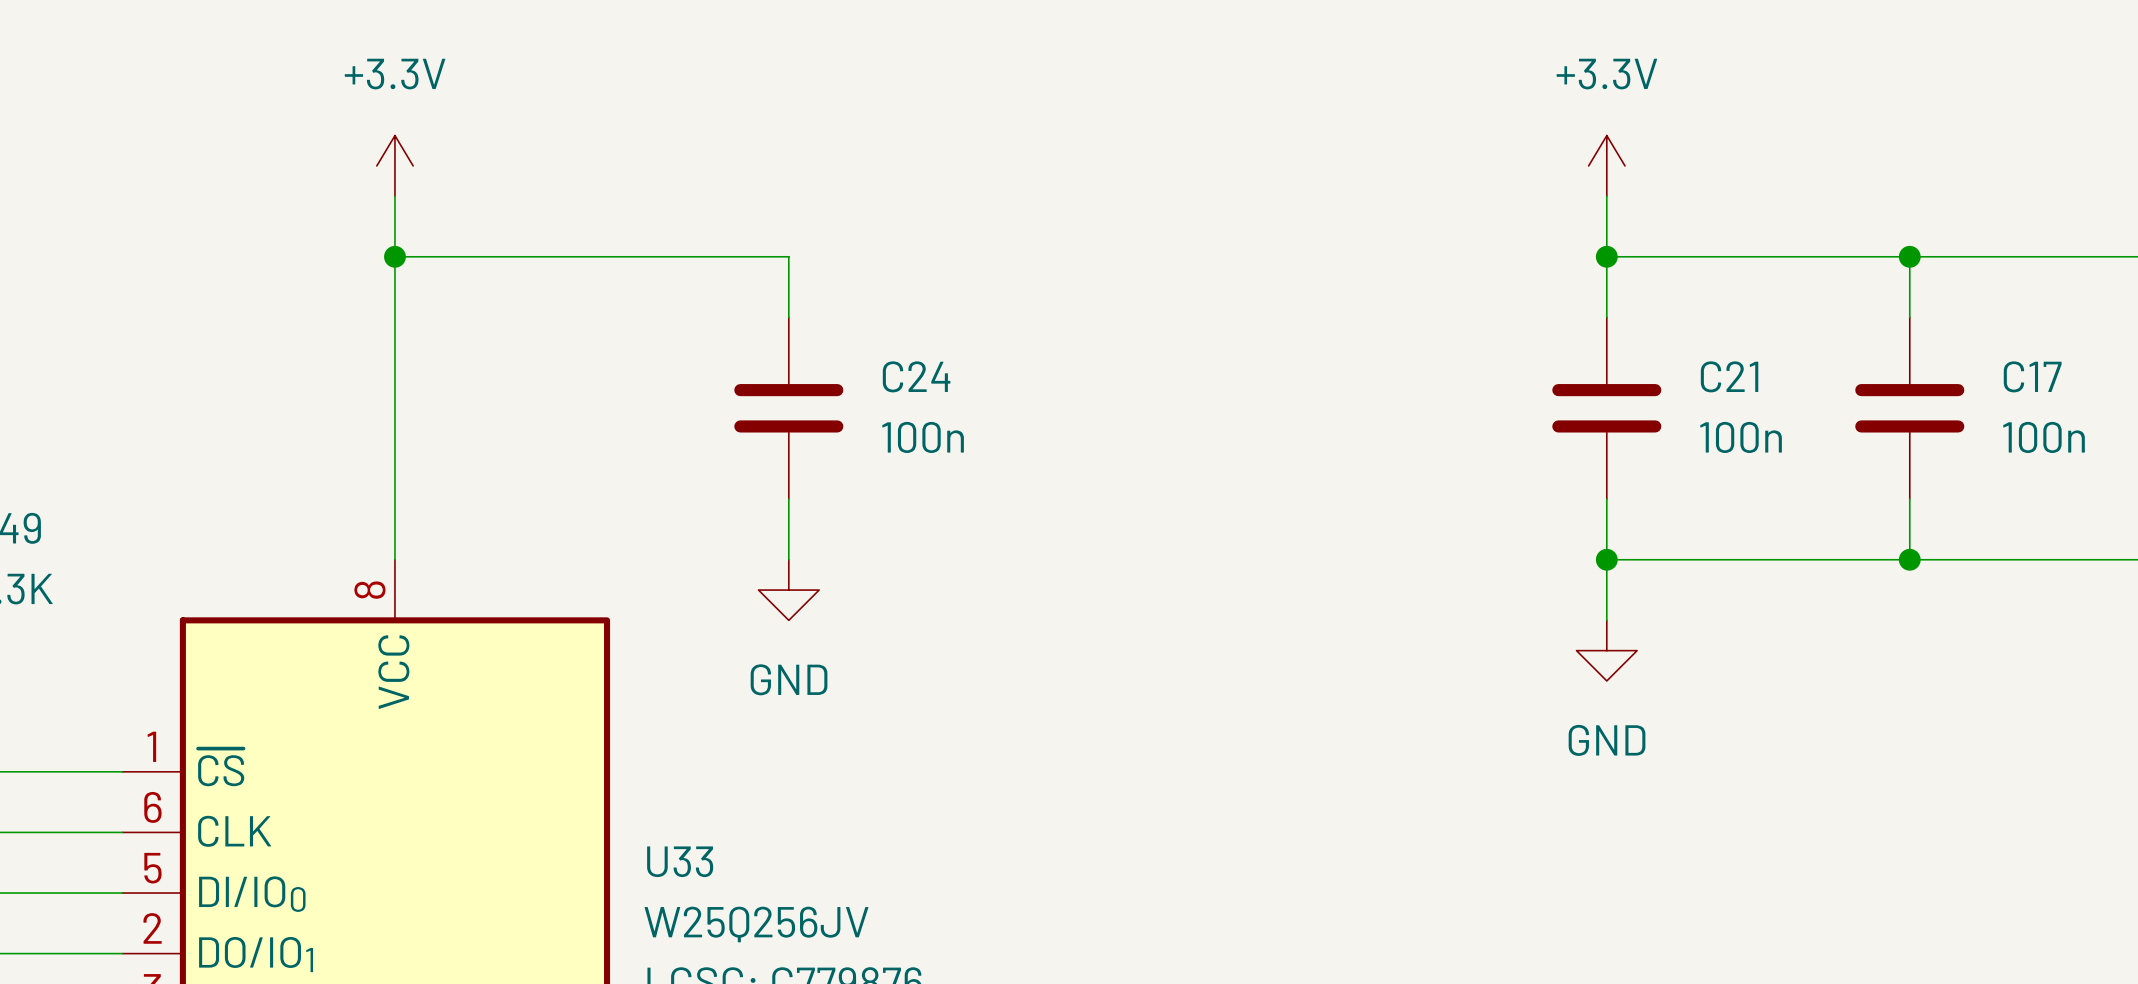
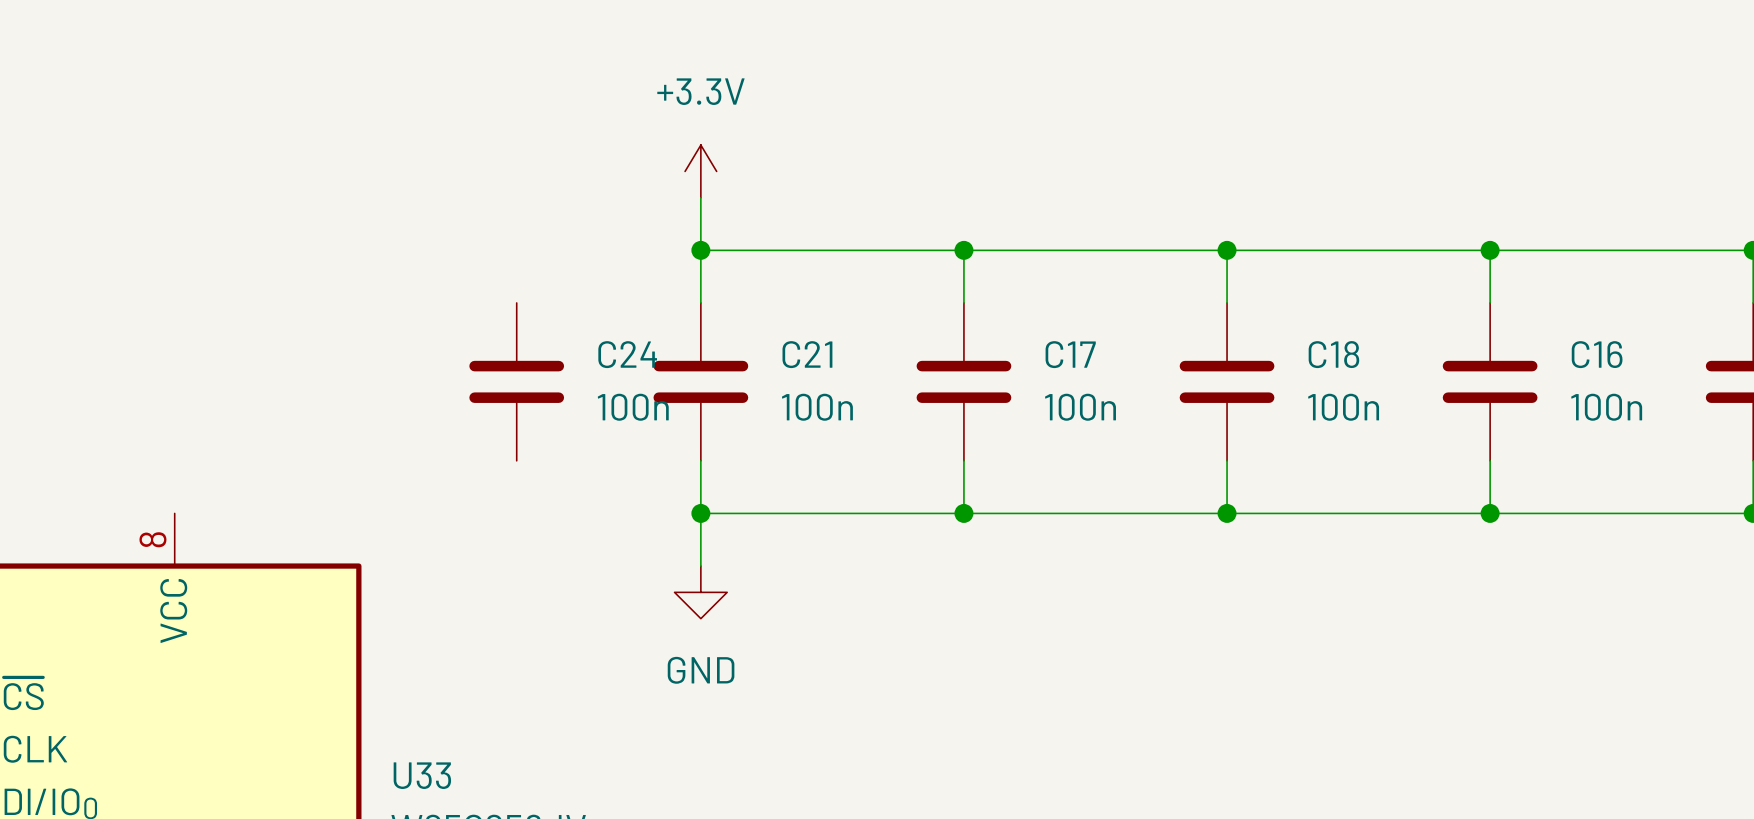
power symbol: +3.3V (394, 165) -> none
power symbol: none -> +3.3V (700, 171)
power symbol: +3.3V (1606, 165) -> none
wire: (394, 196) (394, 559) -> none
wire: none -> (700, 197) (700, 302)
wire: (1606, 196) (1606, 256) -> (700, 250) (1227, 250)
wire: (394, 256) (788, 256) (788, 317) -> none
junction: (394, 256) -> none
junction: none -> (700, 250)
wire: none -> (963, 250) (963, 302)
junction: none -> (963, 250)
C21 name: C21 (1729, 376) -> C18 (1333, 354)
C17 name: C17 (2032, 376) -> C16 (1597, 354)
C21: none -> 100n (700, 381)
C17: none -> 100n (963, 381)
wire: (788, 499) (788, 559) -> (963, 460) (963, 513)
wire: none -> (700, 460) (700, 566)
junction: none -> (700, 513)
junction: none -> (963, 513)
wire: (1606, 559) (1606, 620) -> (1227, 513) (700, 513)
power symbol position: GND (788, 590) -> GND (700, 592)
power symbol: GND (1606, 650) -> none

